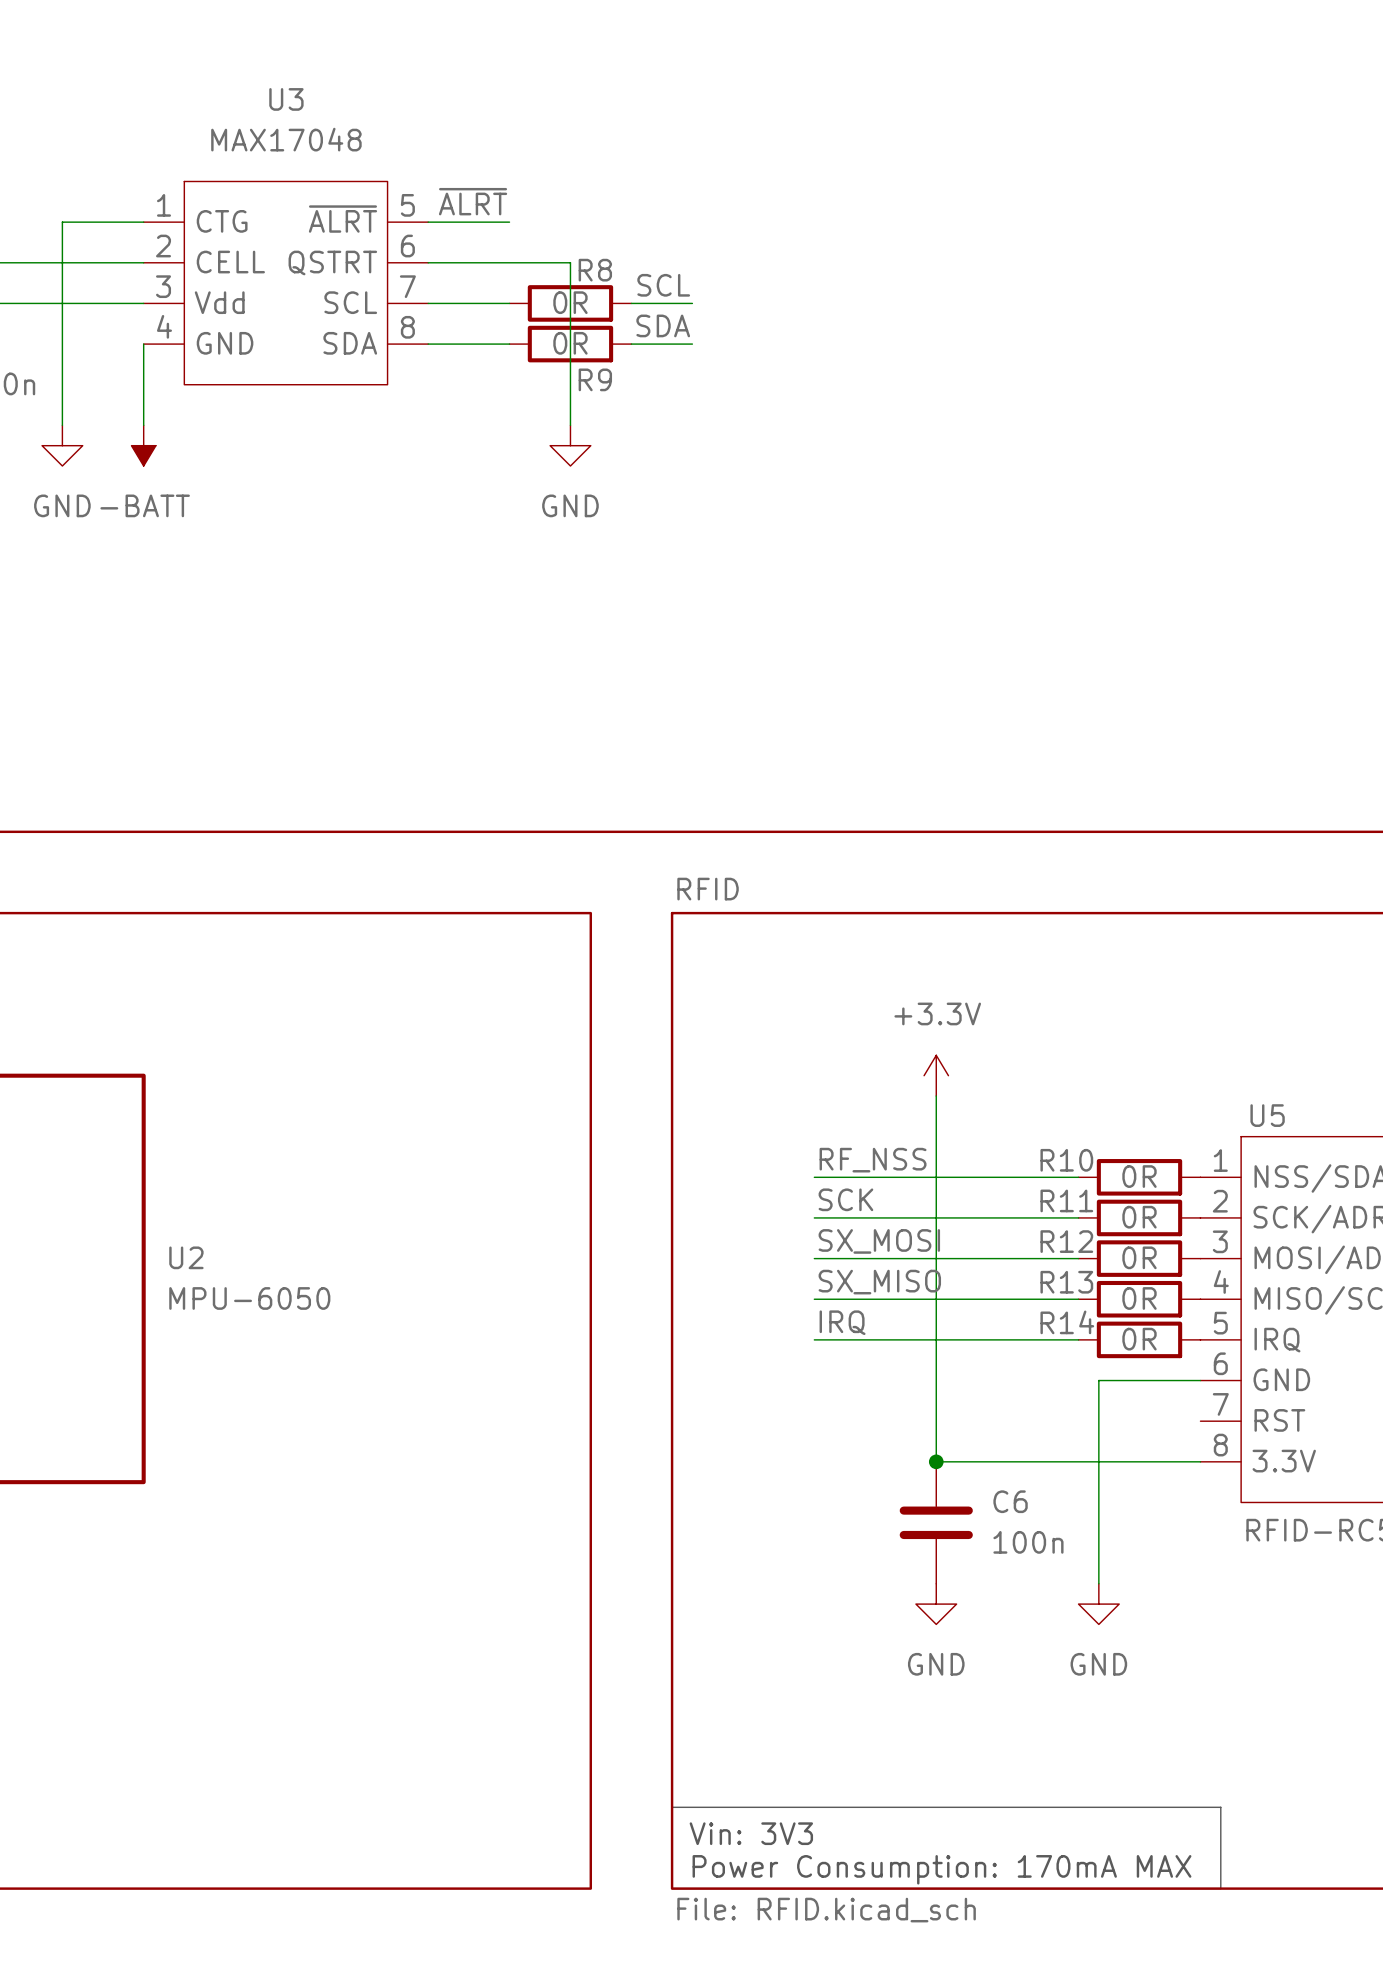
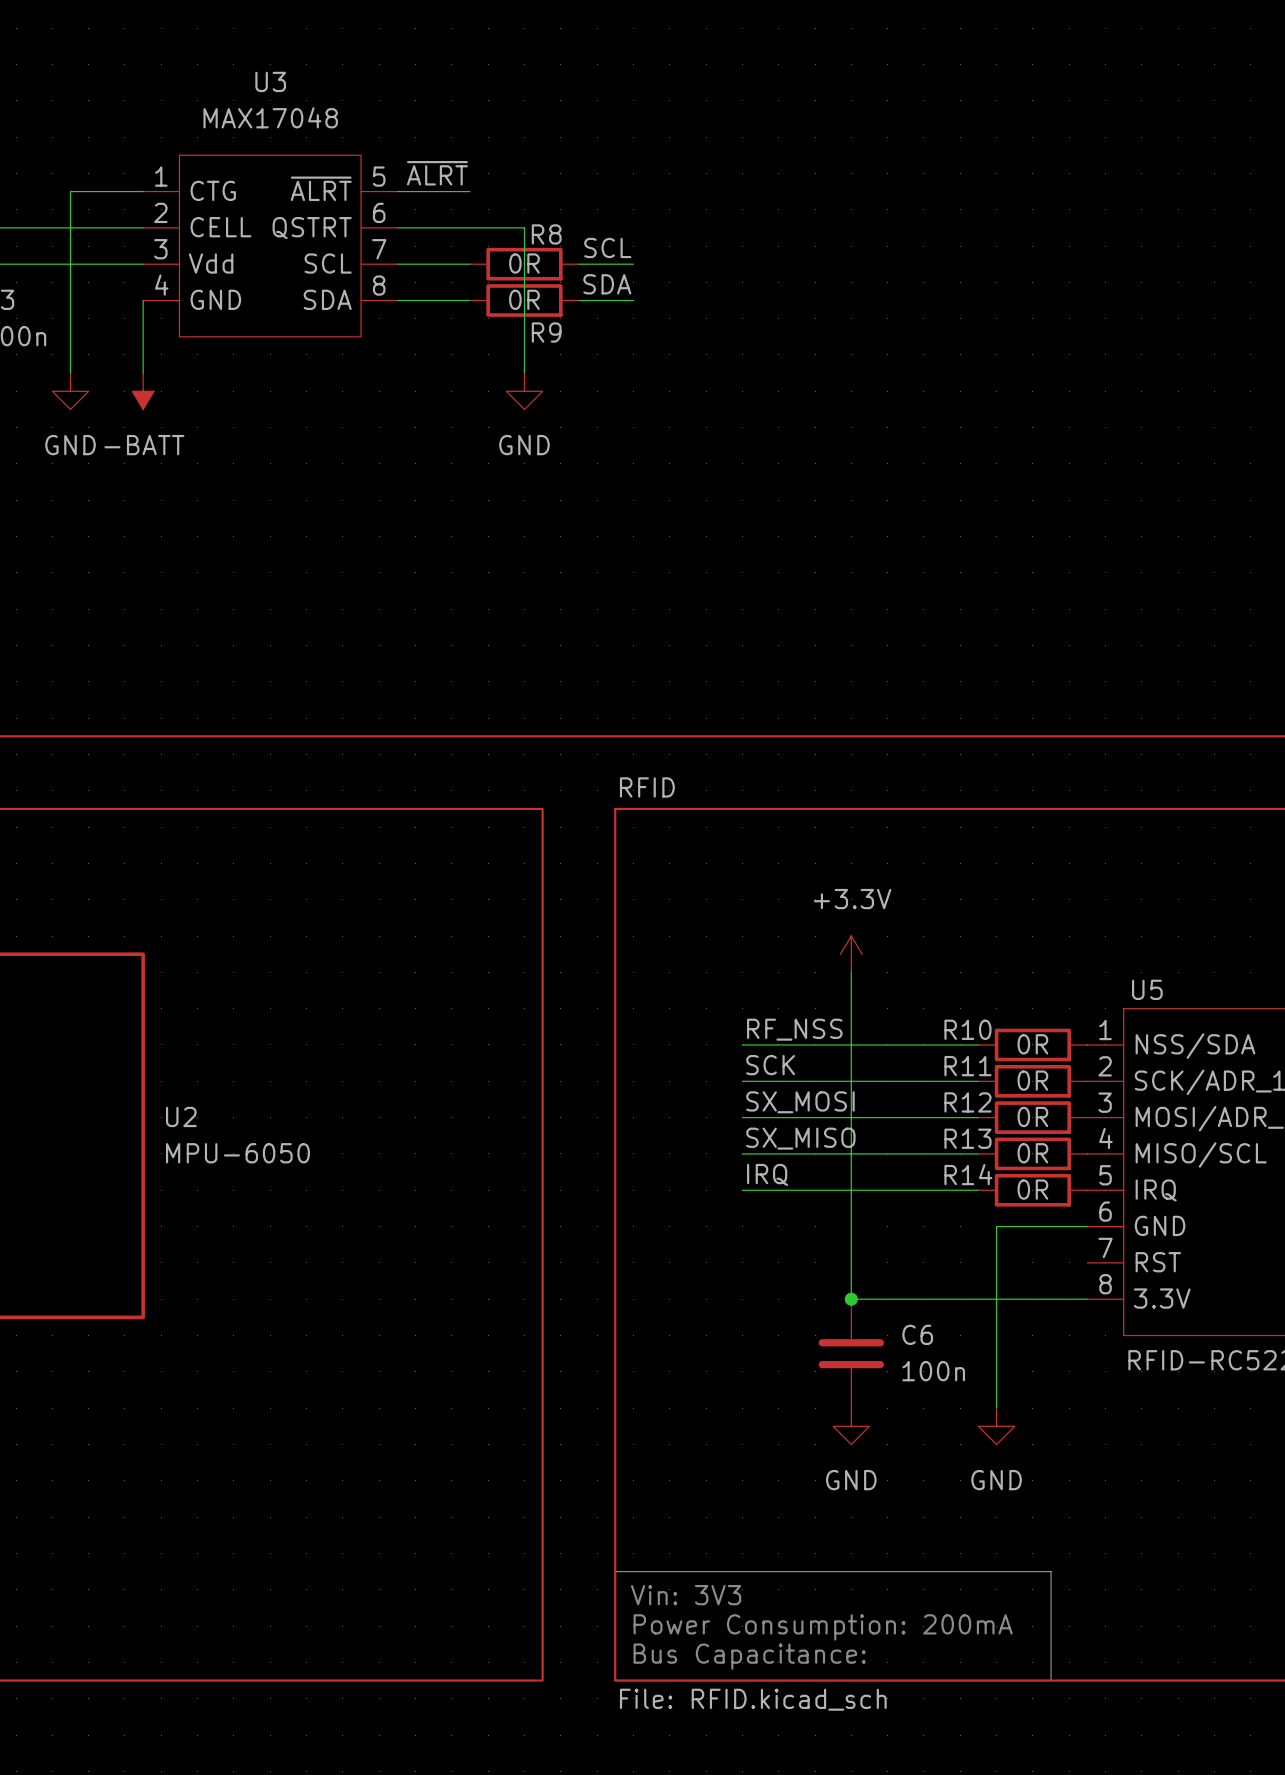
text: none -> Vin: 3V3 (686, 1595)
line: (672, 1807) (1220, 1807) (1220, 1888) (1159, 1888) -> (615, 1607) (615, 1571) (1051, 1571) (1051, 1680)
text: Vin: 3V3 (751, 1833) -> Power Consumption: 200mA (823, 1627)
text: Power Consumption: 170mA MAX (941, 1869) -> Bus Capacitance: (749, 1656)

